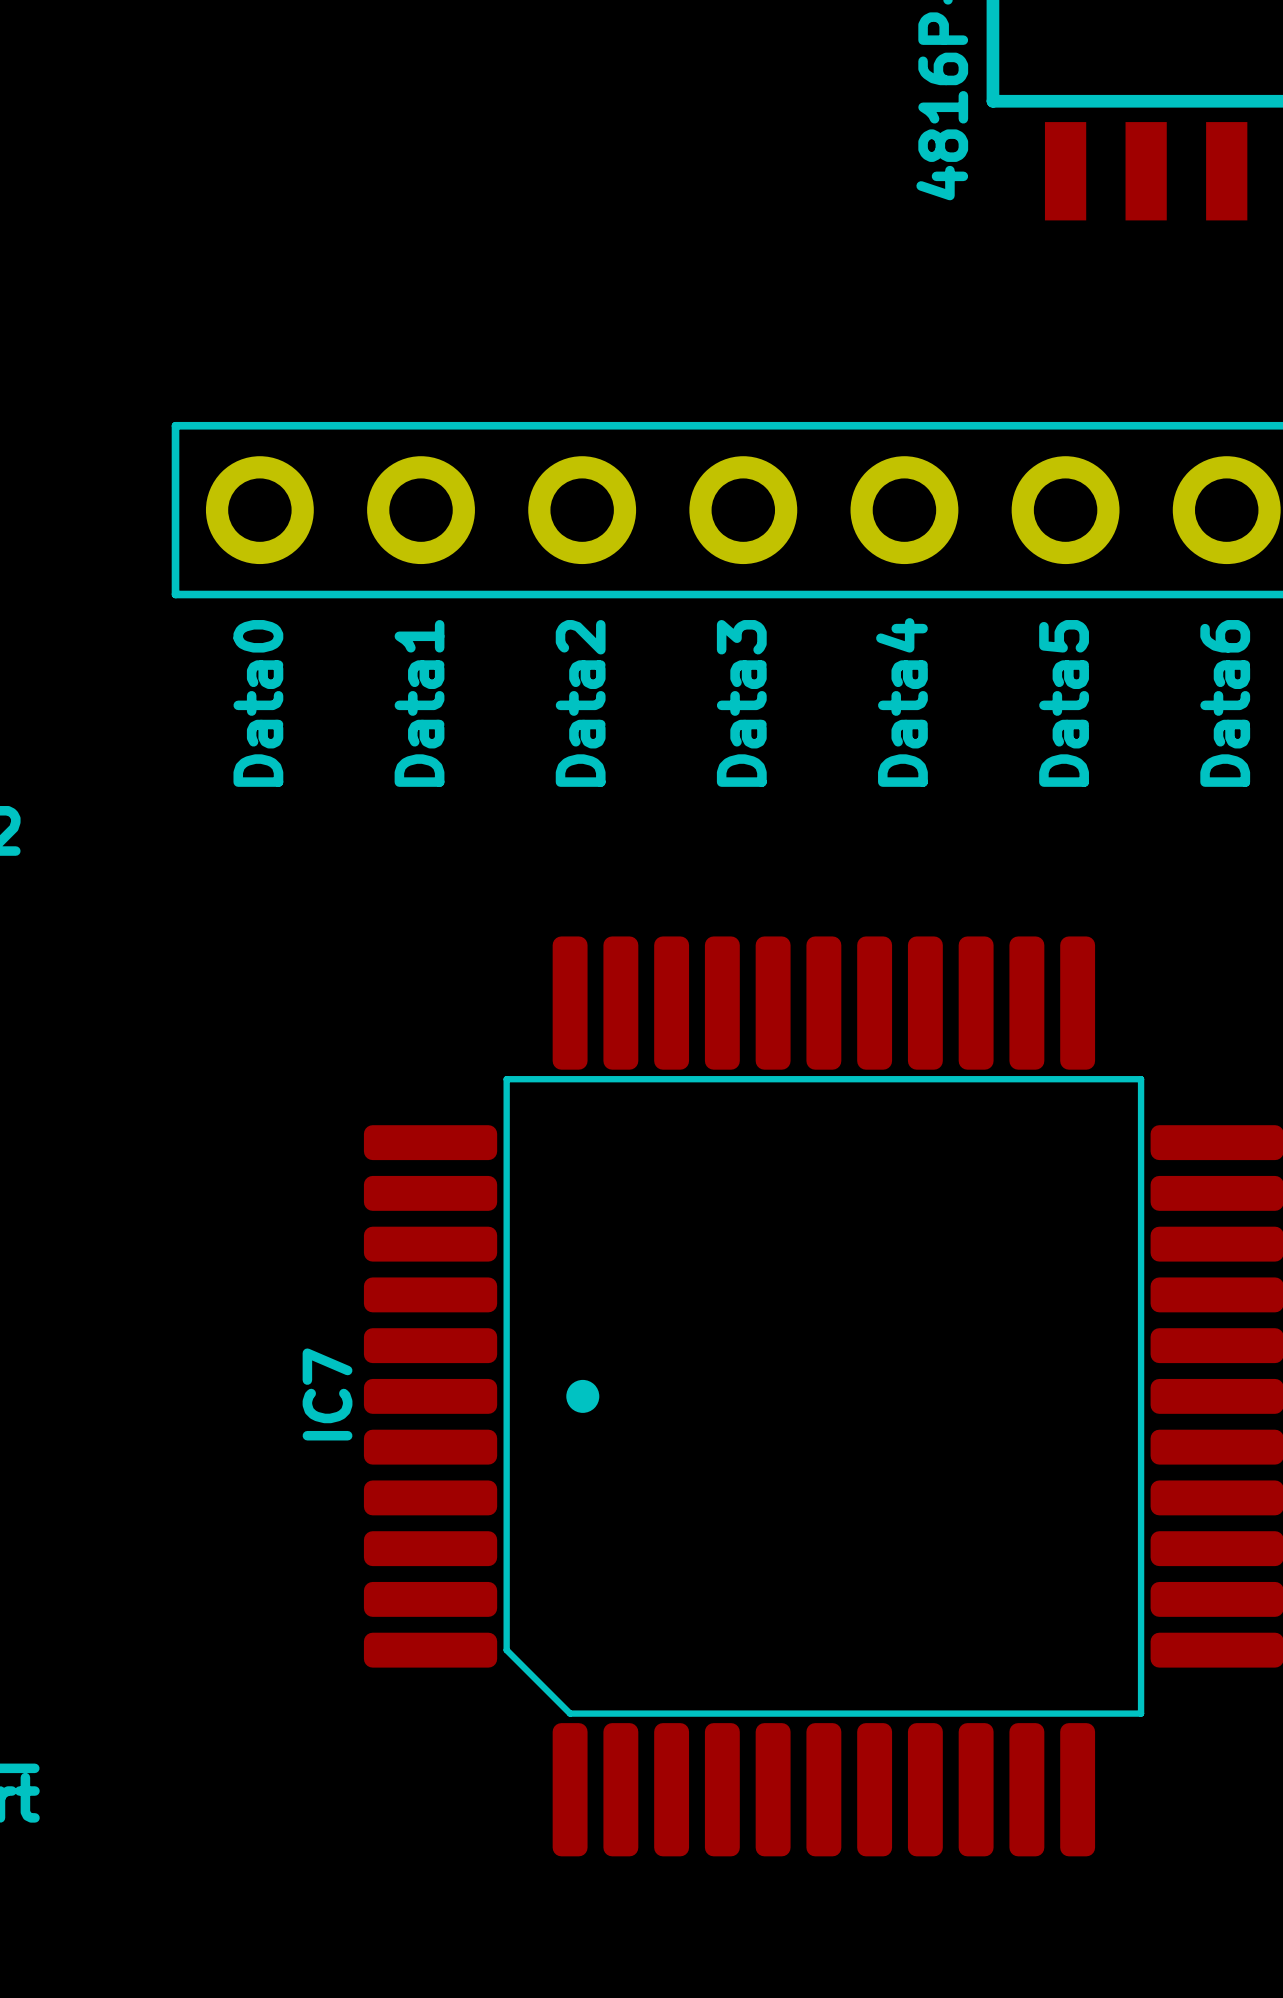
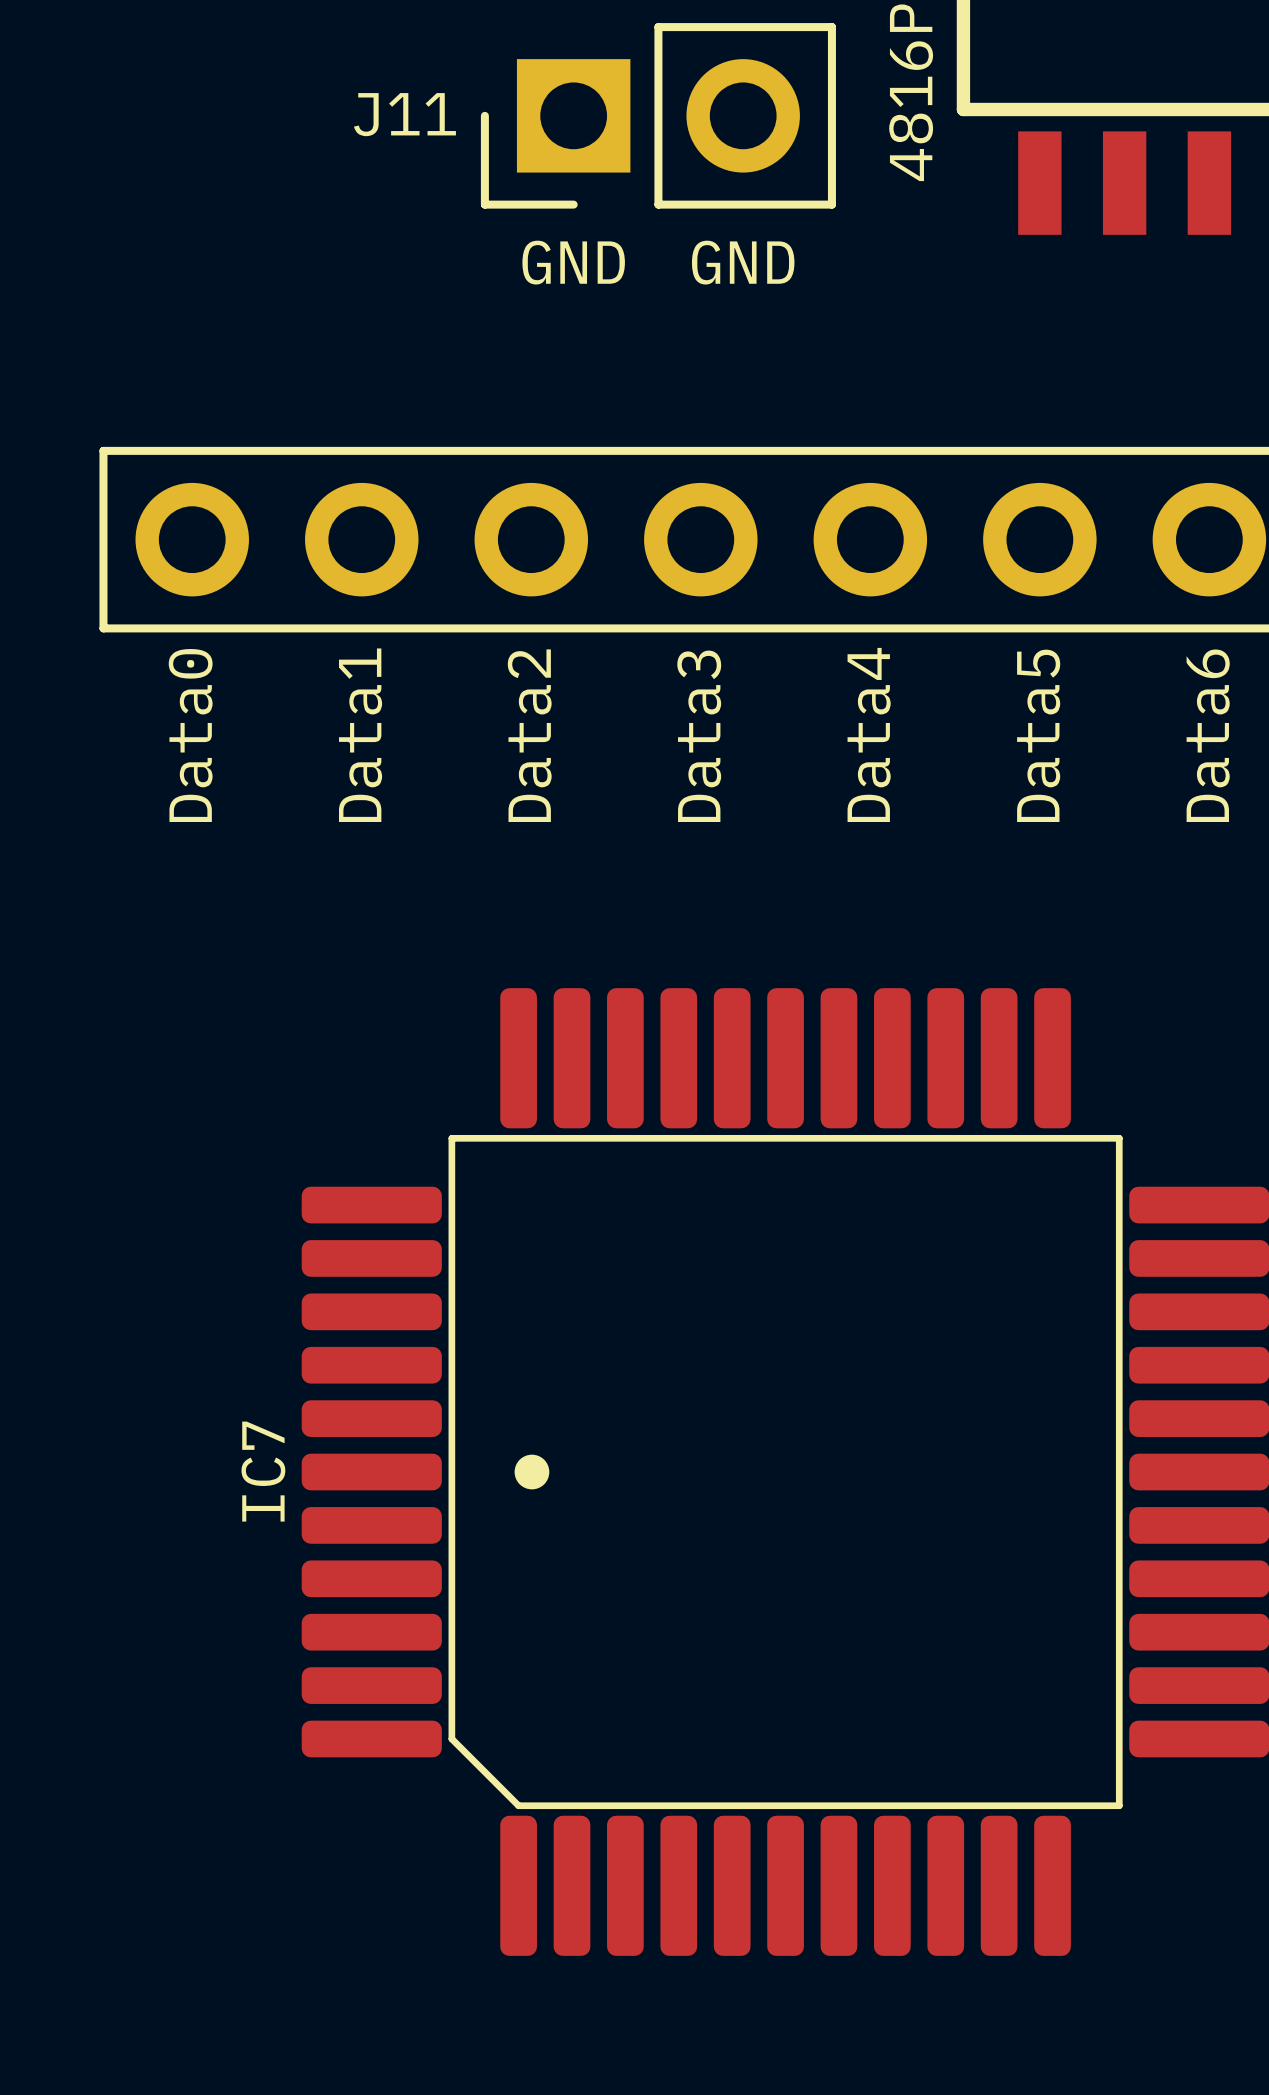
J11: none -> (658, 115)
text: none -> GND (573, 262)
text: none -> GND (743, 262)

